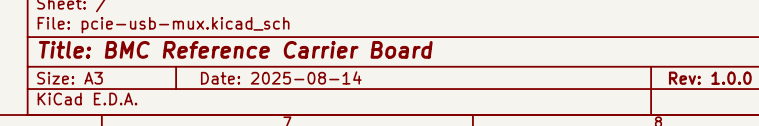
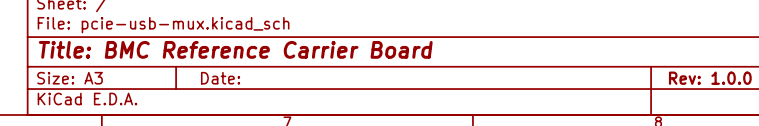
title block: Date: 2025-08-14 (281, 77) -> Date: (220, 78)

